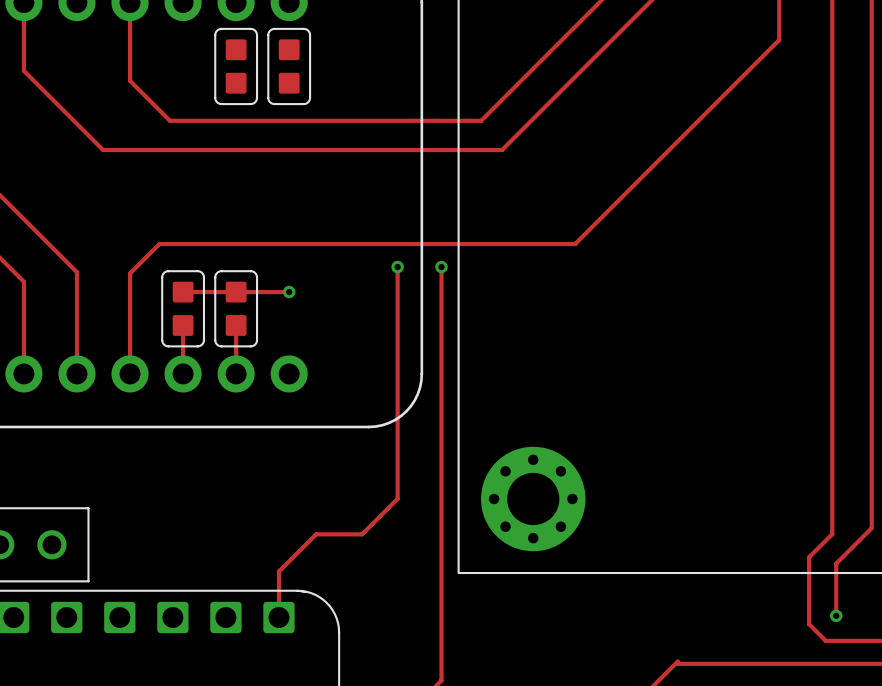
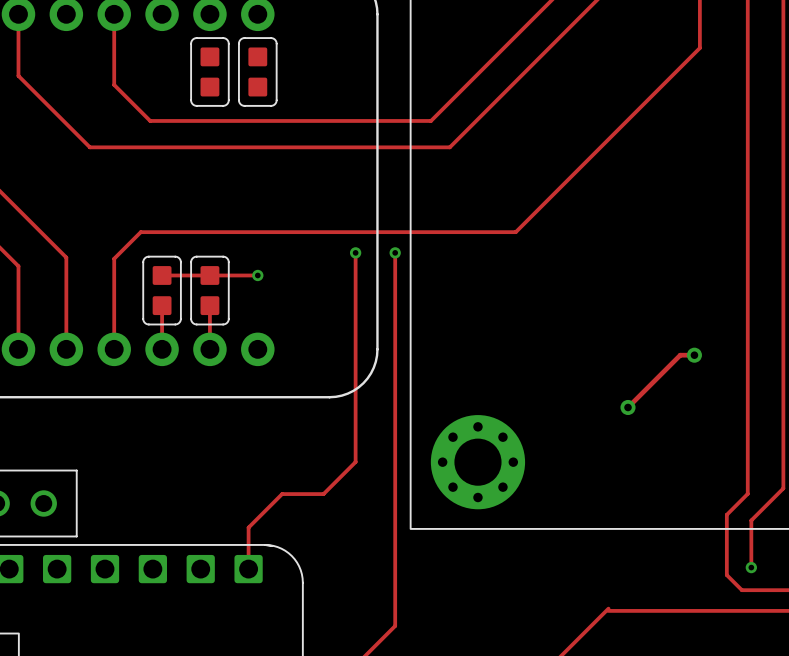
track: none -> (694, 355) (680, 355) (628, 407)
via: none -> (694, 355)
via: none -> (628, 407)

